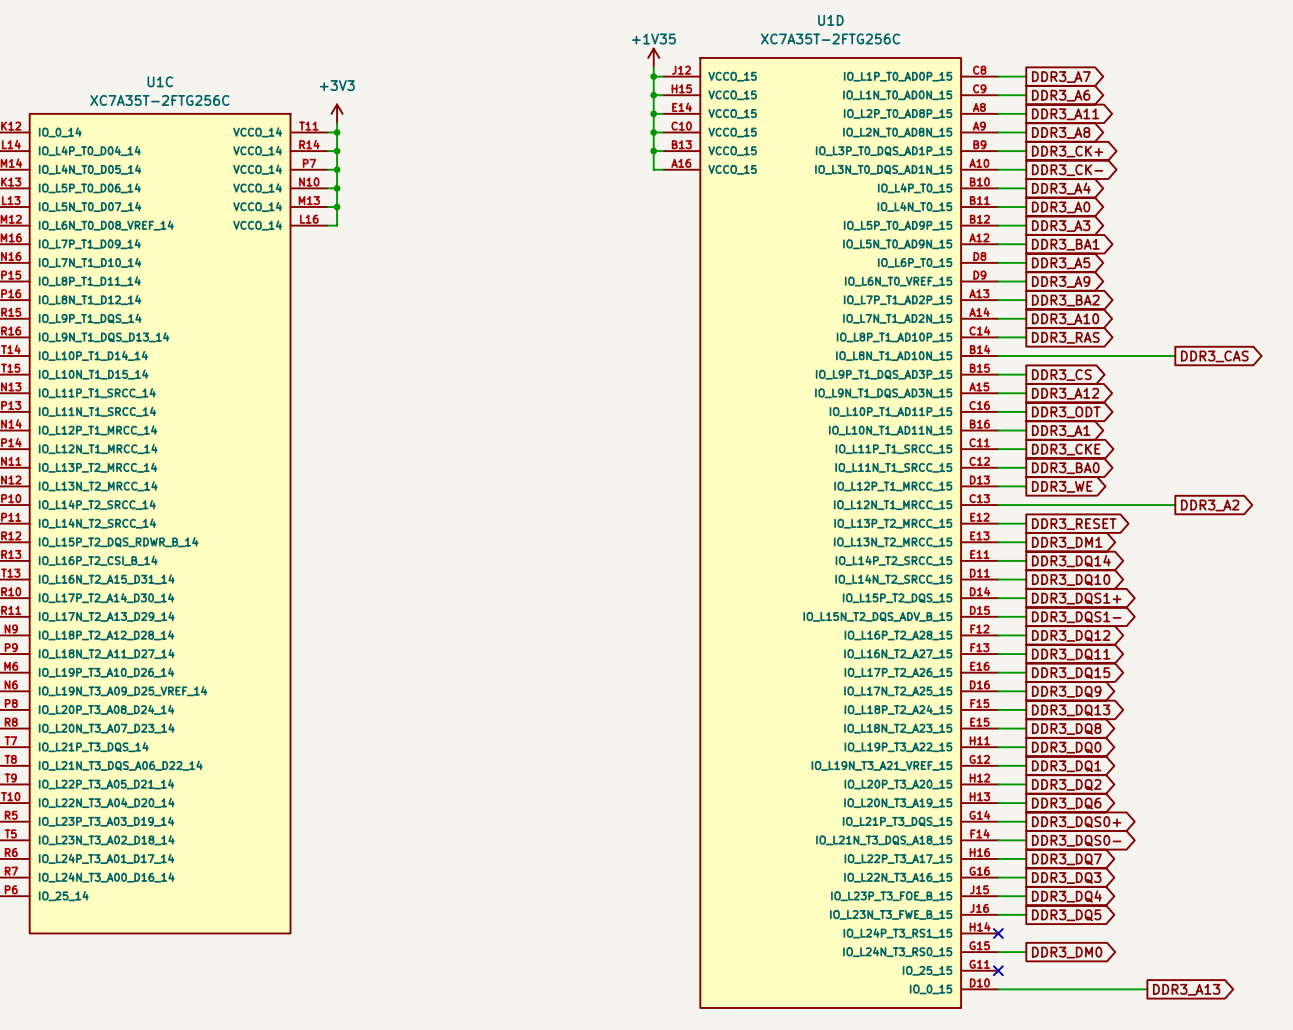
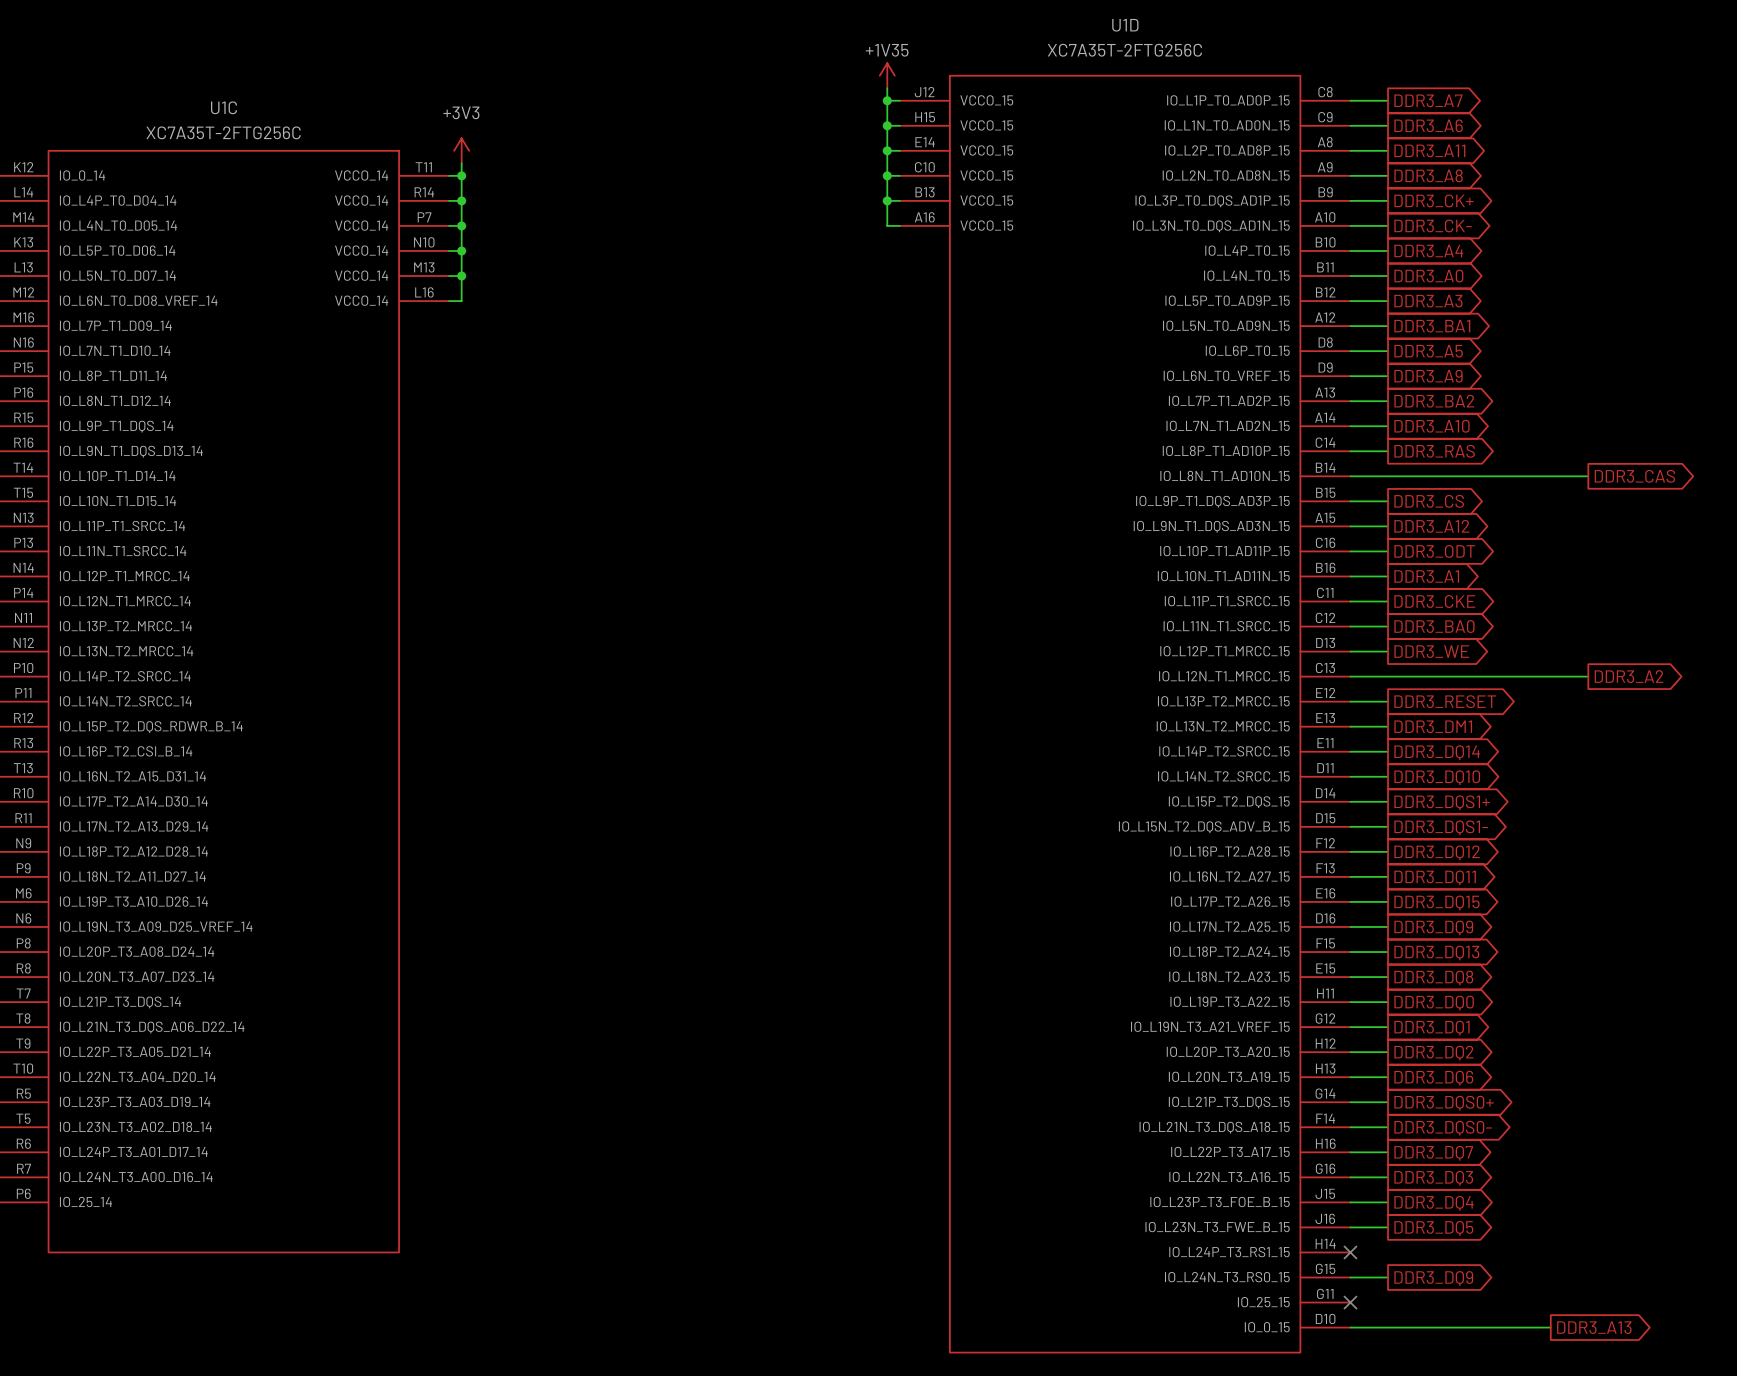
global label: DDR3_DM0 (1067, 952) -> DDR3_DQ9 (1433, 1278)

